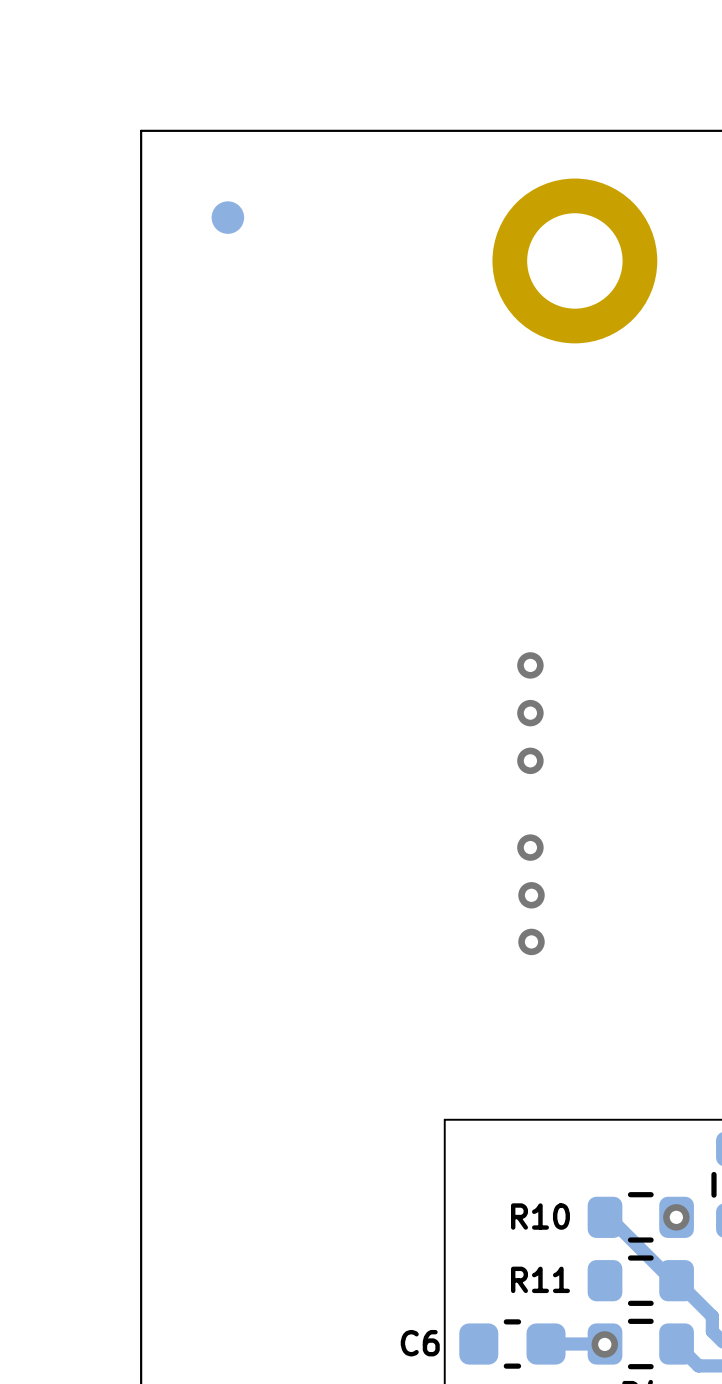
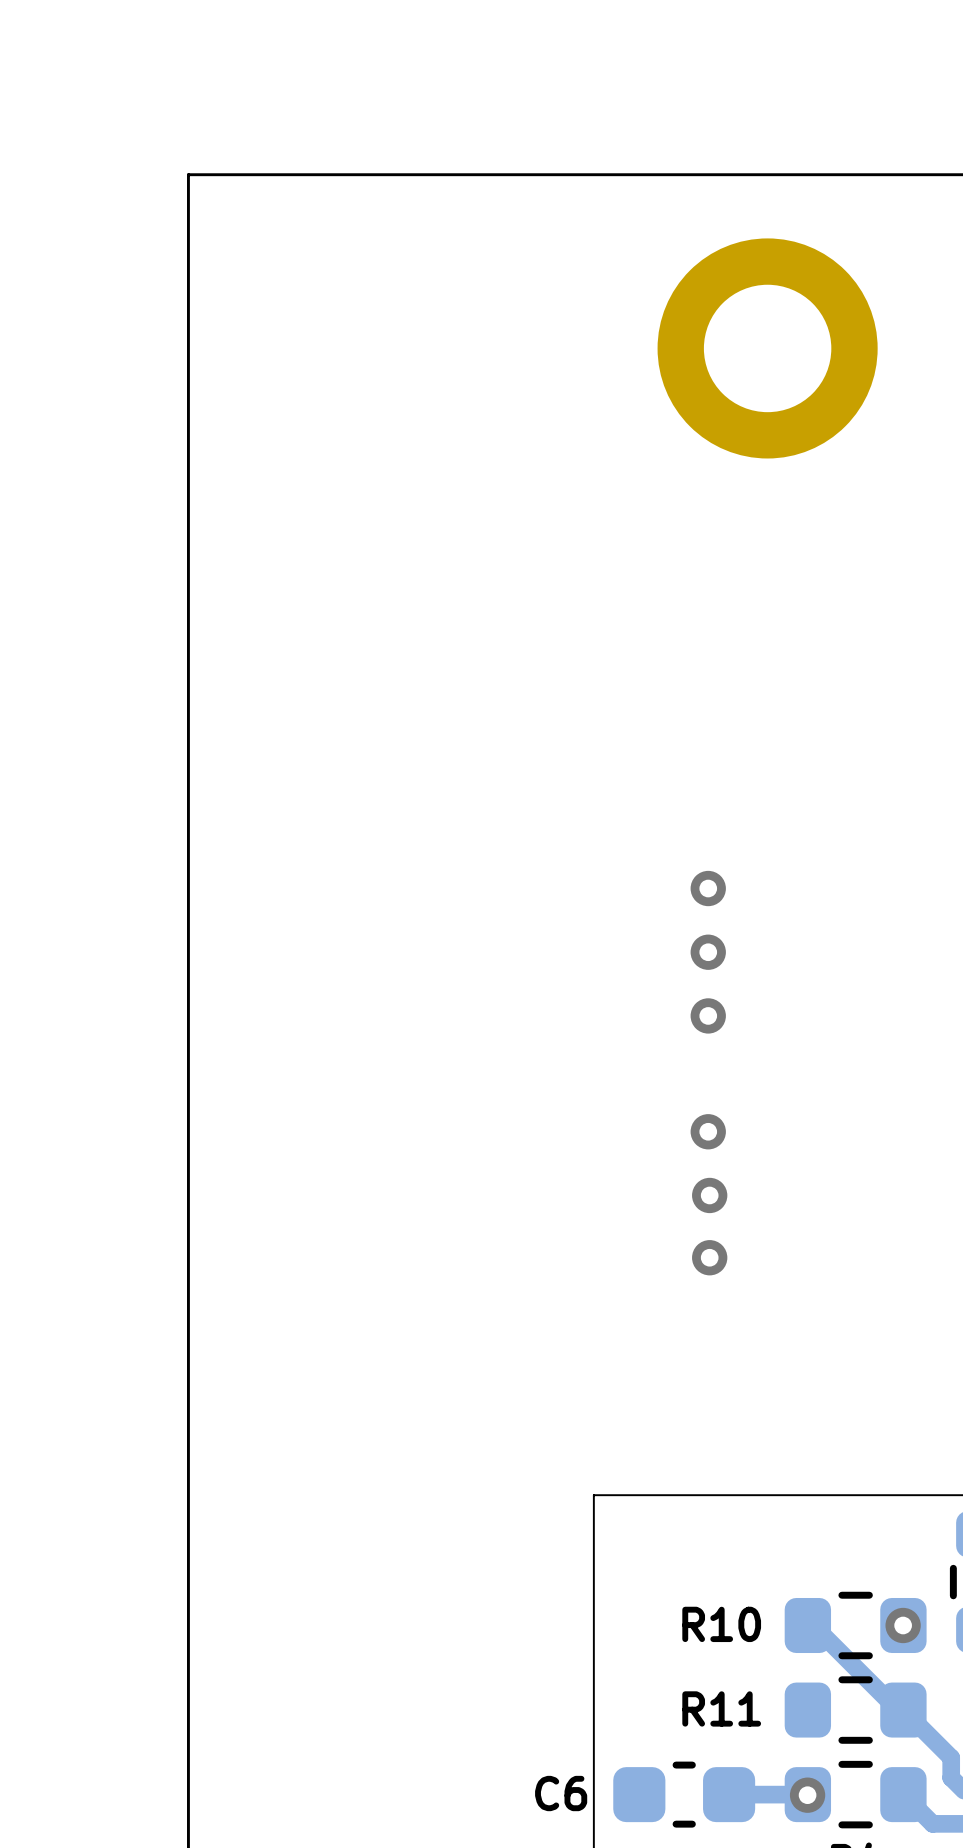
part: (227, 217) -> none

